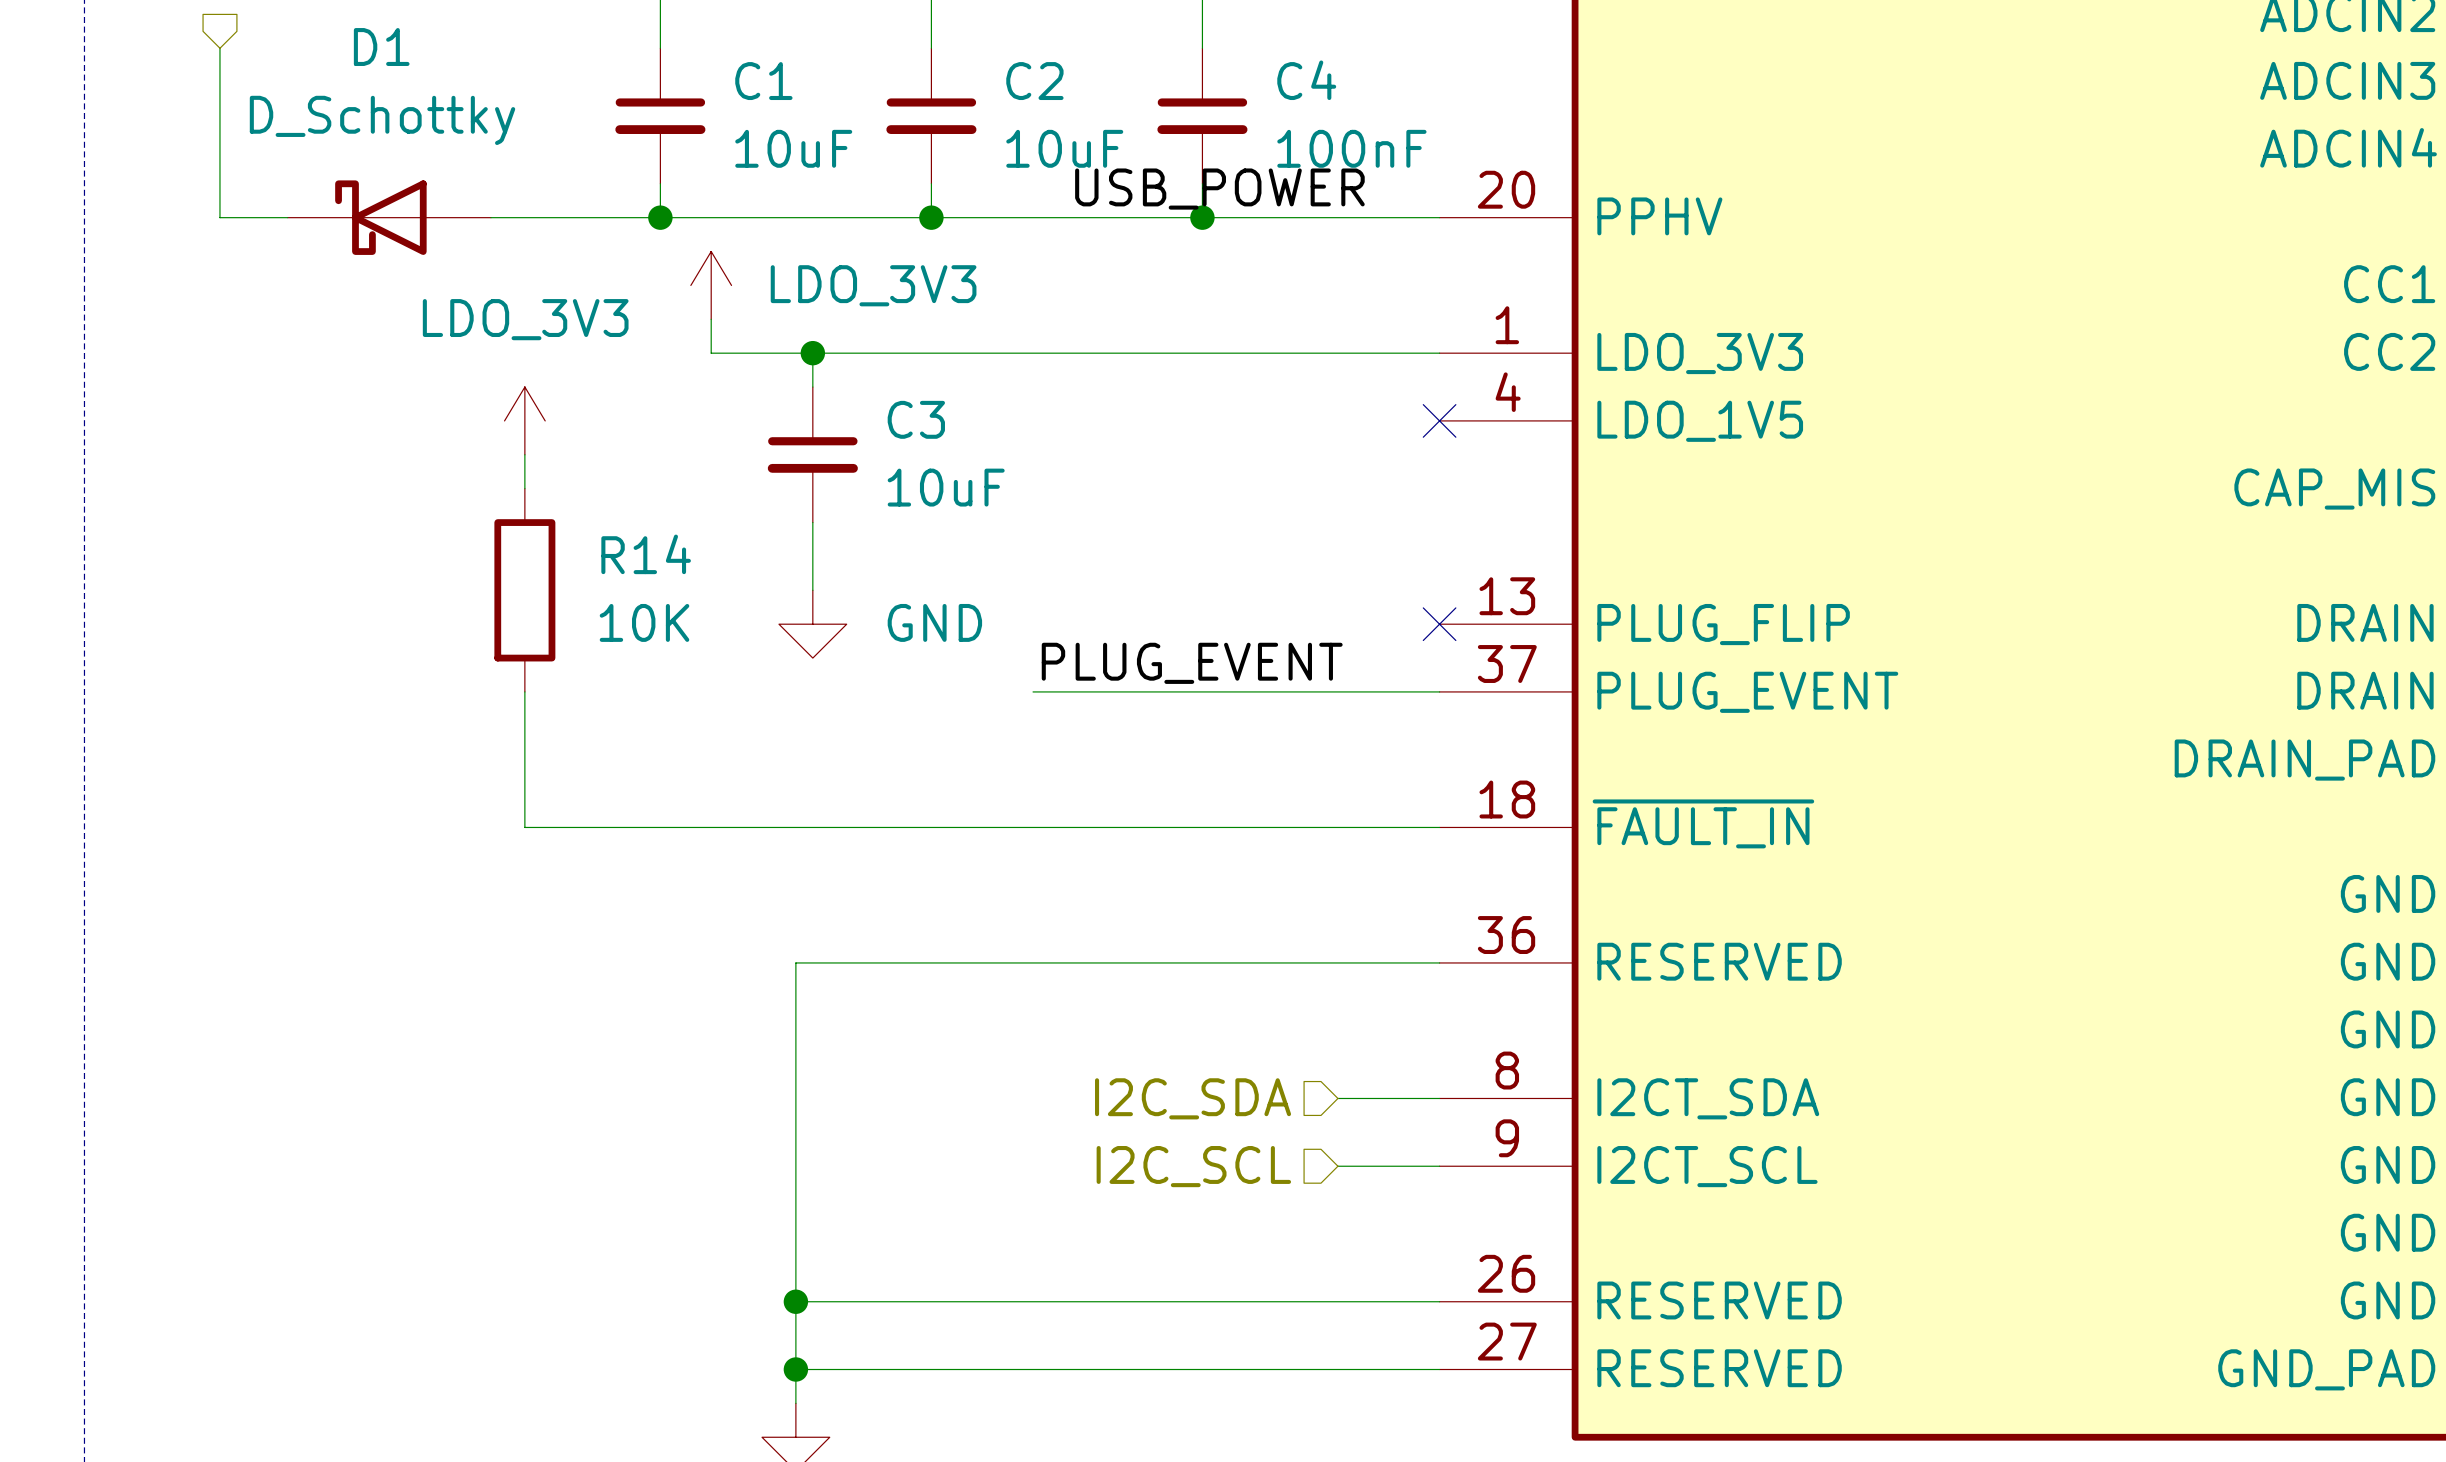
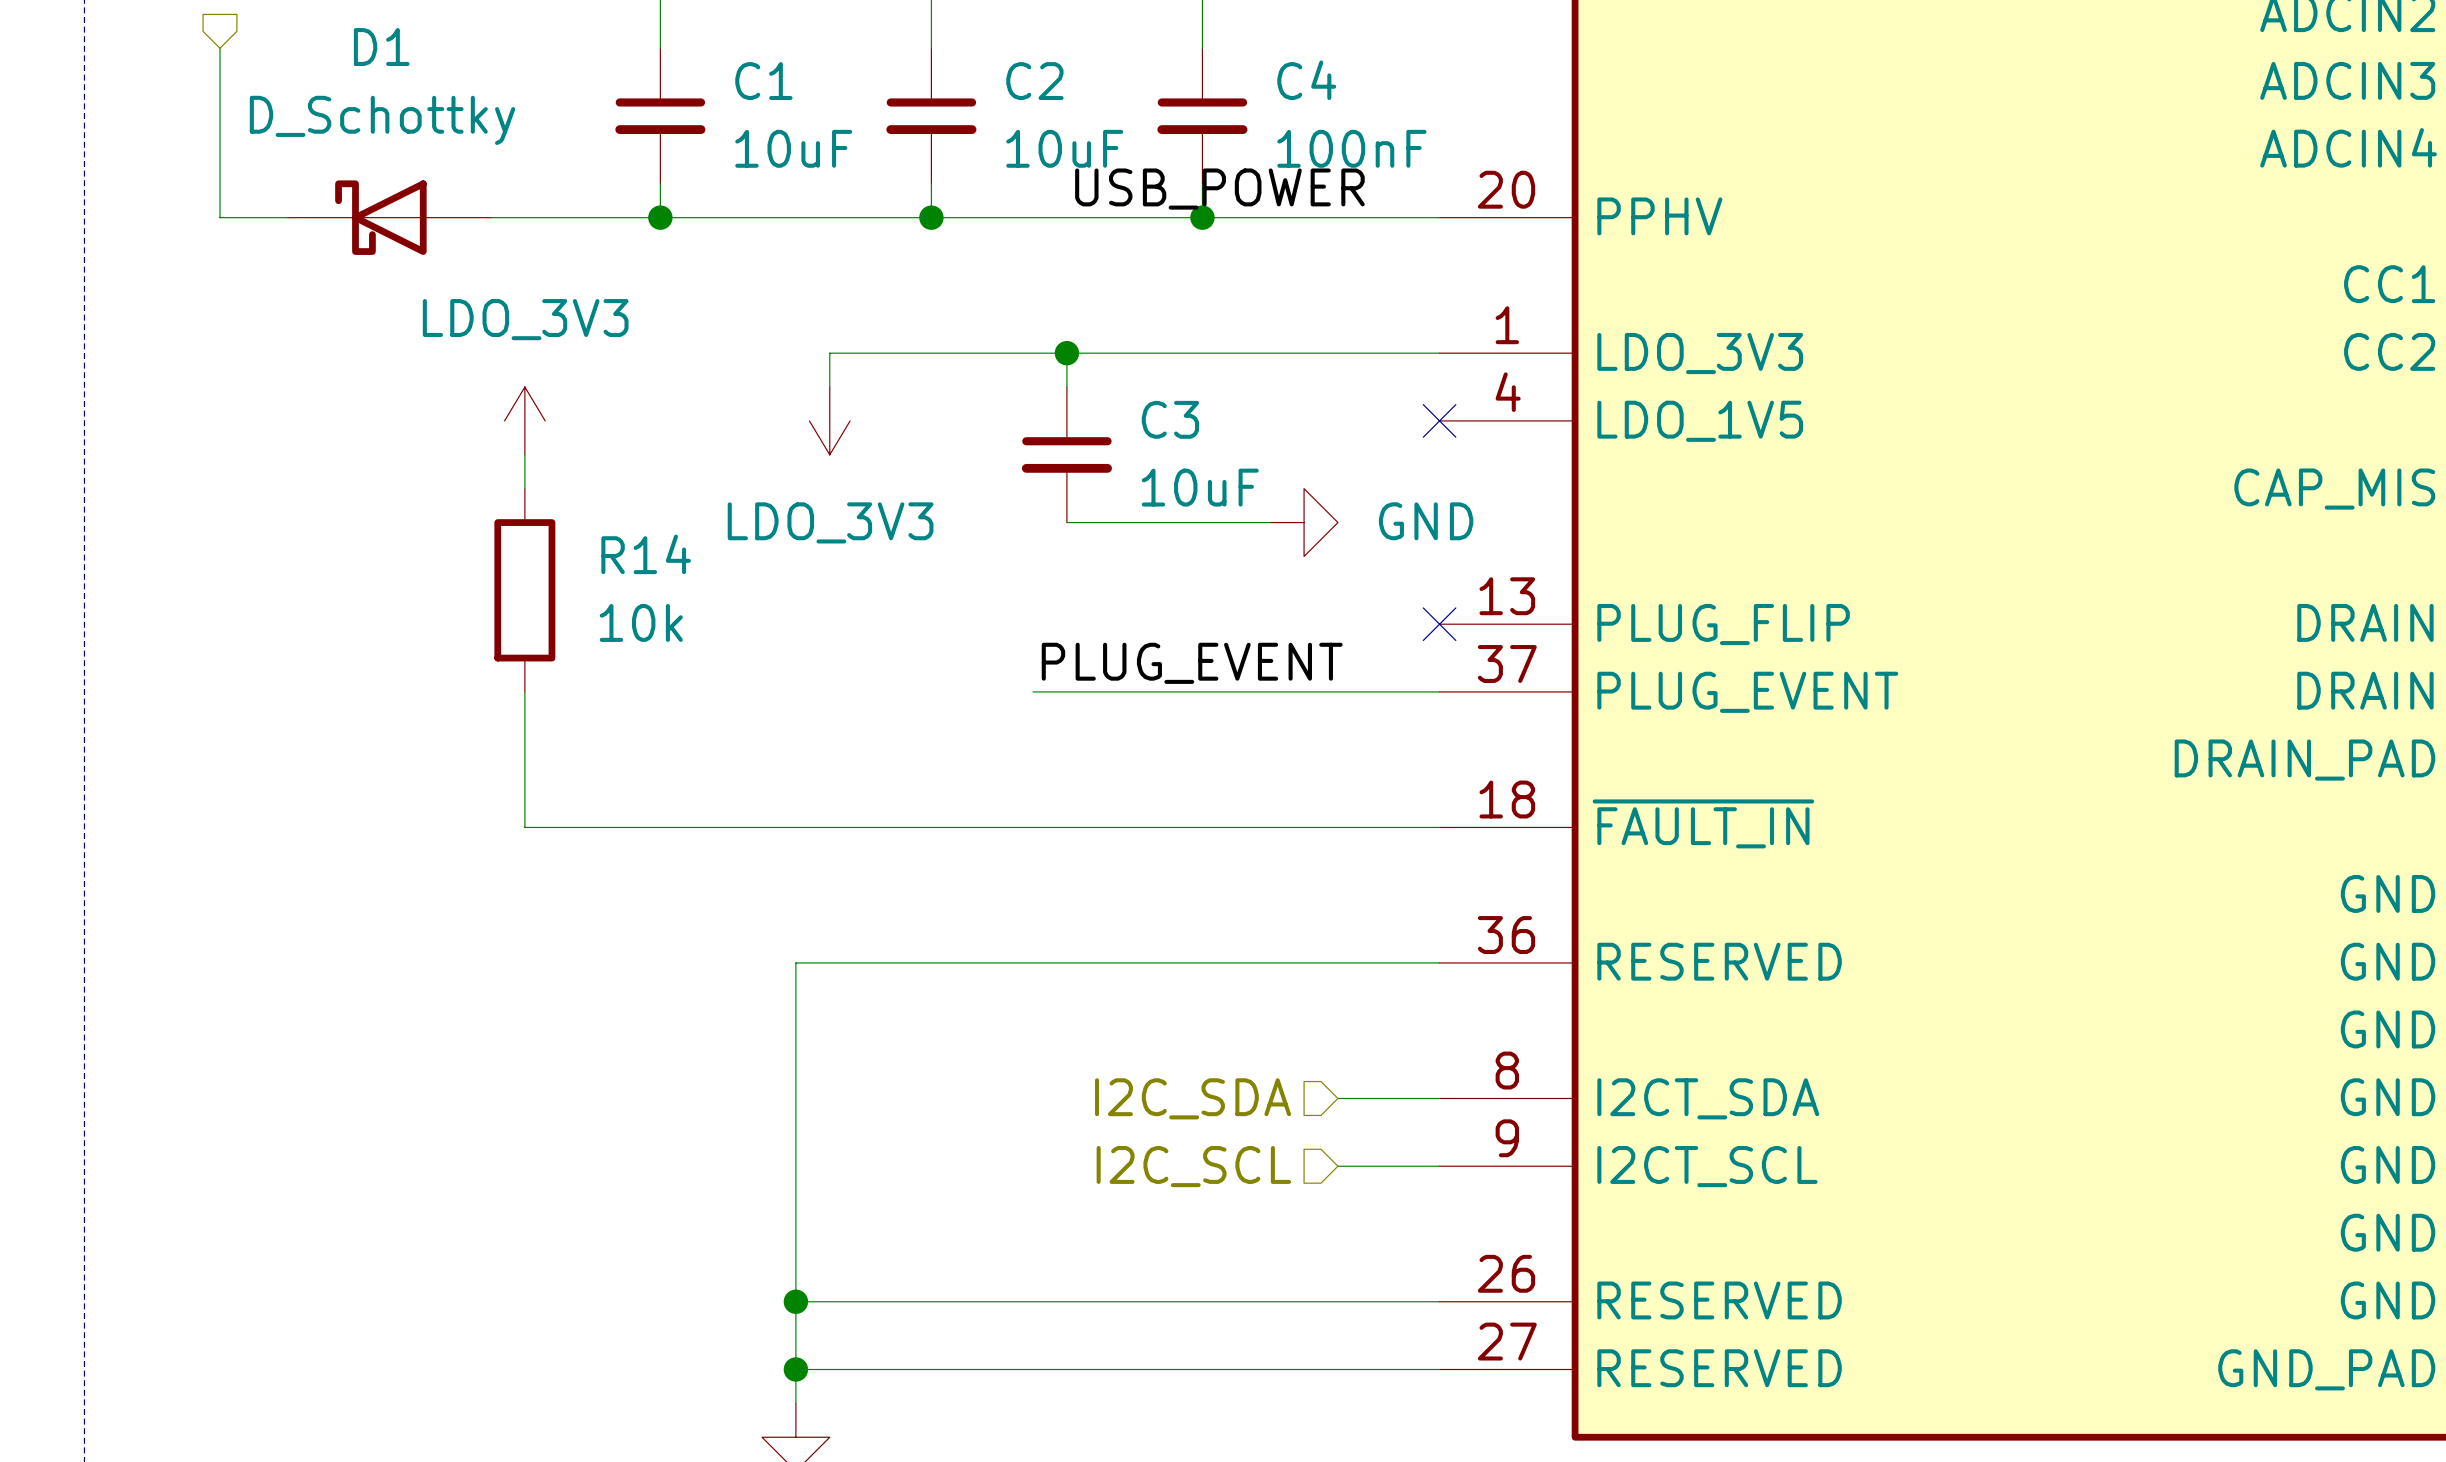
power symbol rotation: 0° (711, 285) -> 180° (829, 420)
power symbol position: LDO_3V3 (711, 285) -> LDO_3V3 (829, 420)
power symbol text position: LDO_3V3 (873, 285) -> LDO_3V3 (830, 522)
wire: (711, 319) (711, 353) (829, 353) -> (829, 387) (829, 353)
wire: (812, 353) (812, 387) -> (1066, 353) (1066, 387)
junction: (812, 353) -> none
junction: none -> (1066, 353)
C3 position: (812, 454) -> (1066, 454)
wire: (812, 522) (812, 590) -> none
wire: none -> (1066, 522) (1270, 522)
R14 value: 10K (644, 622) -> 10k (641, 622)
power symbol rotation: 0° (812, 624) -> 90° counterclockwise (1304, 522)
power symbol position: GND (812, 624) -> GND (1304, 522)

